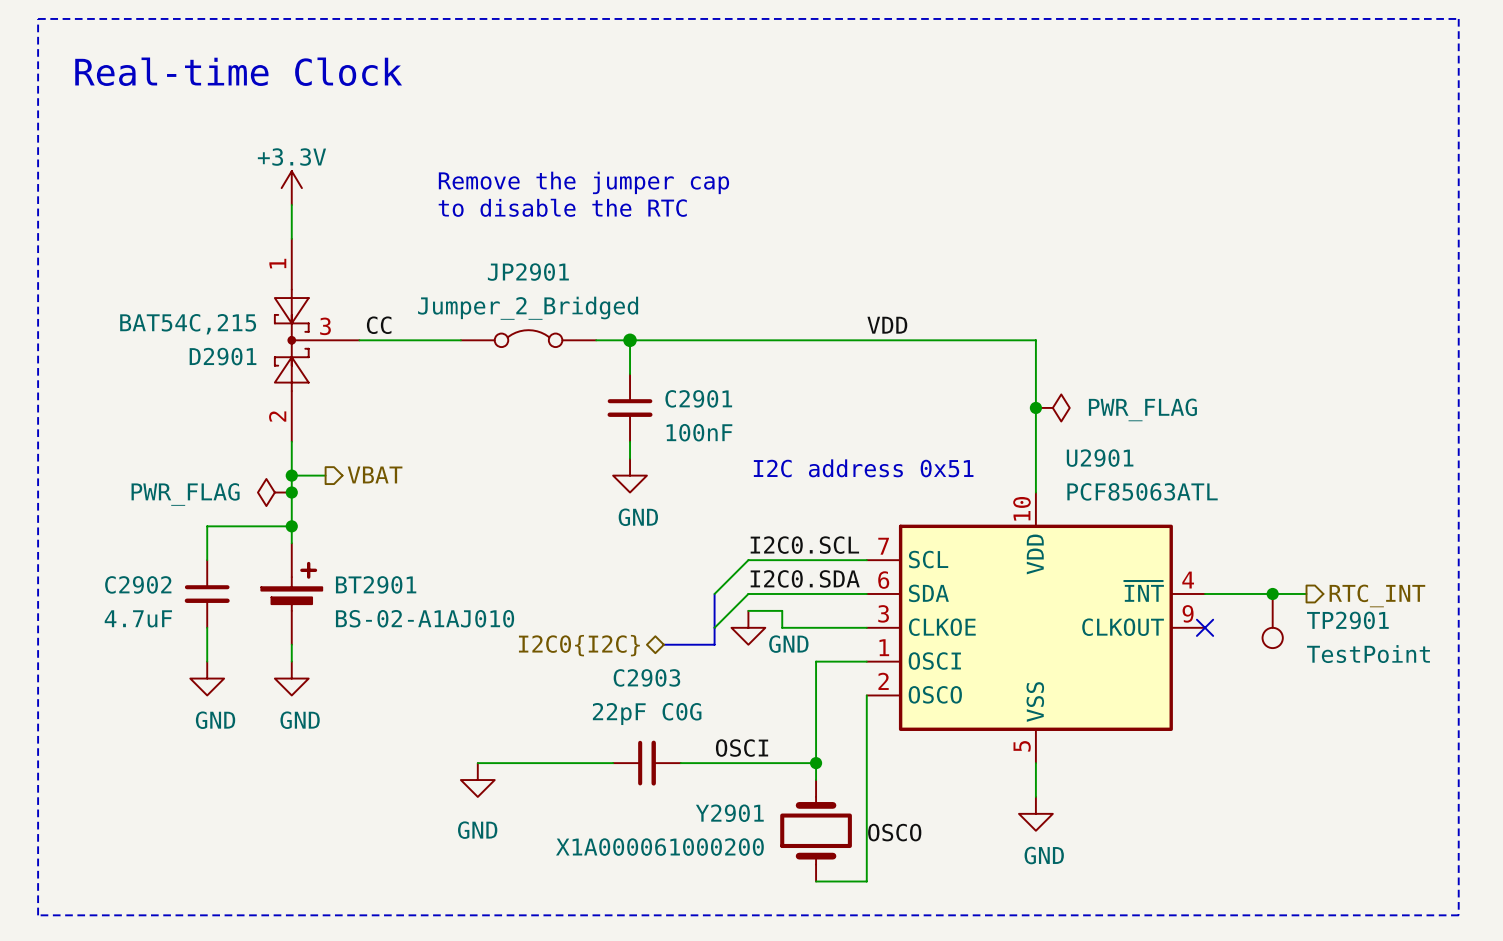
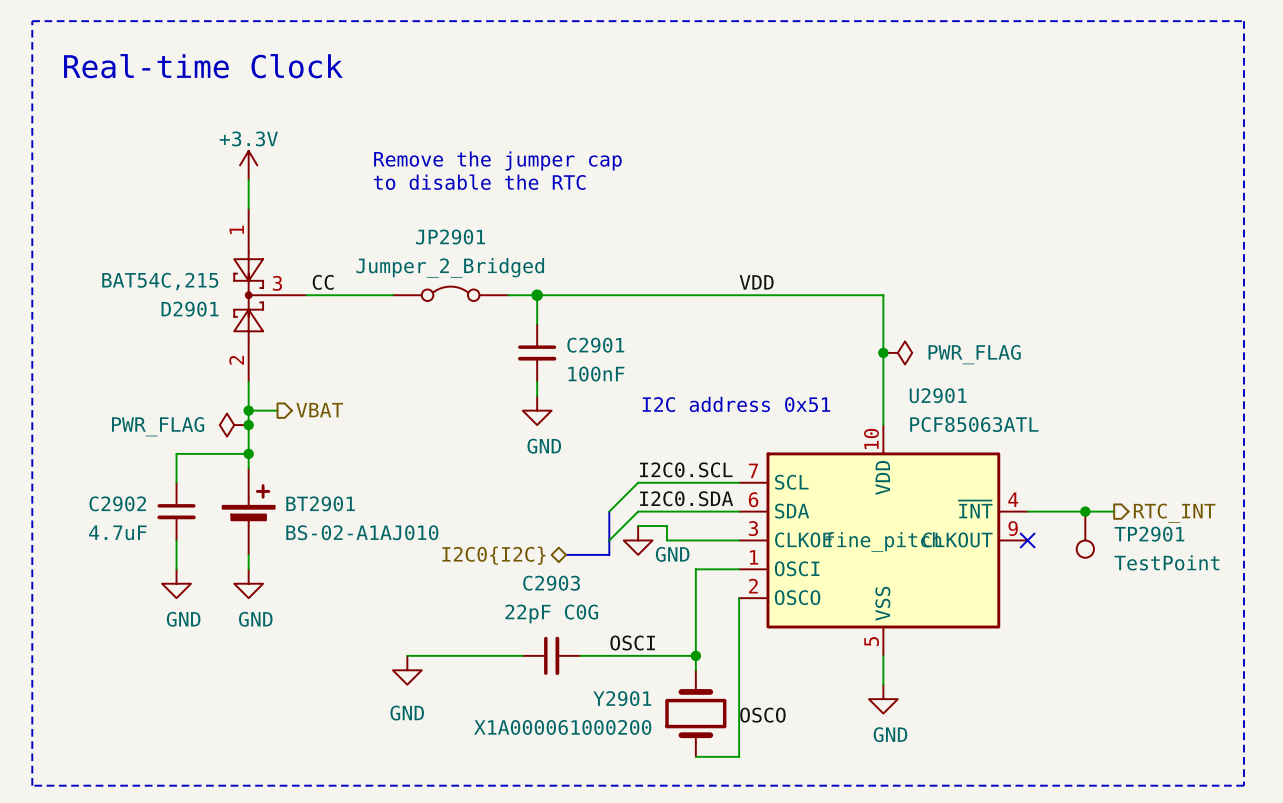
U2901 text: none -> fine_pitch (883, 541)

